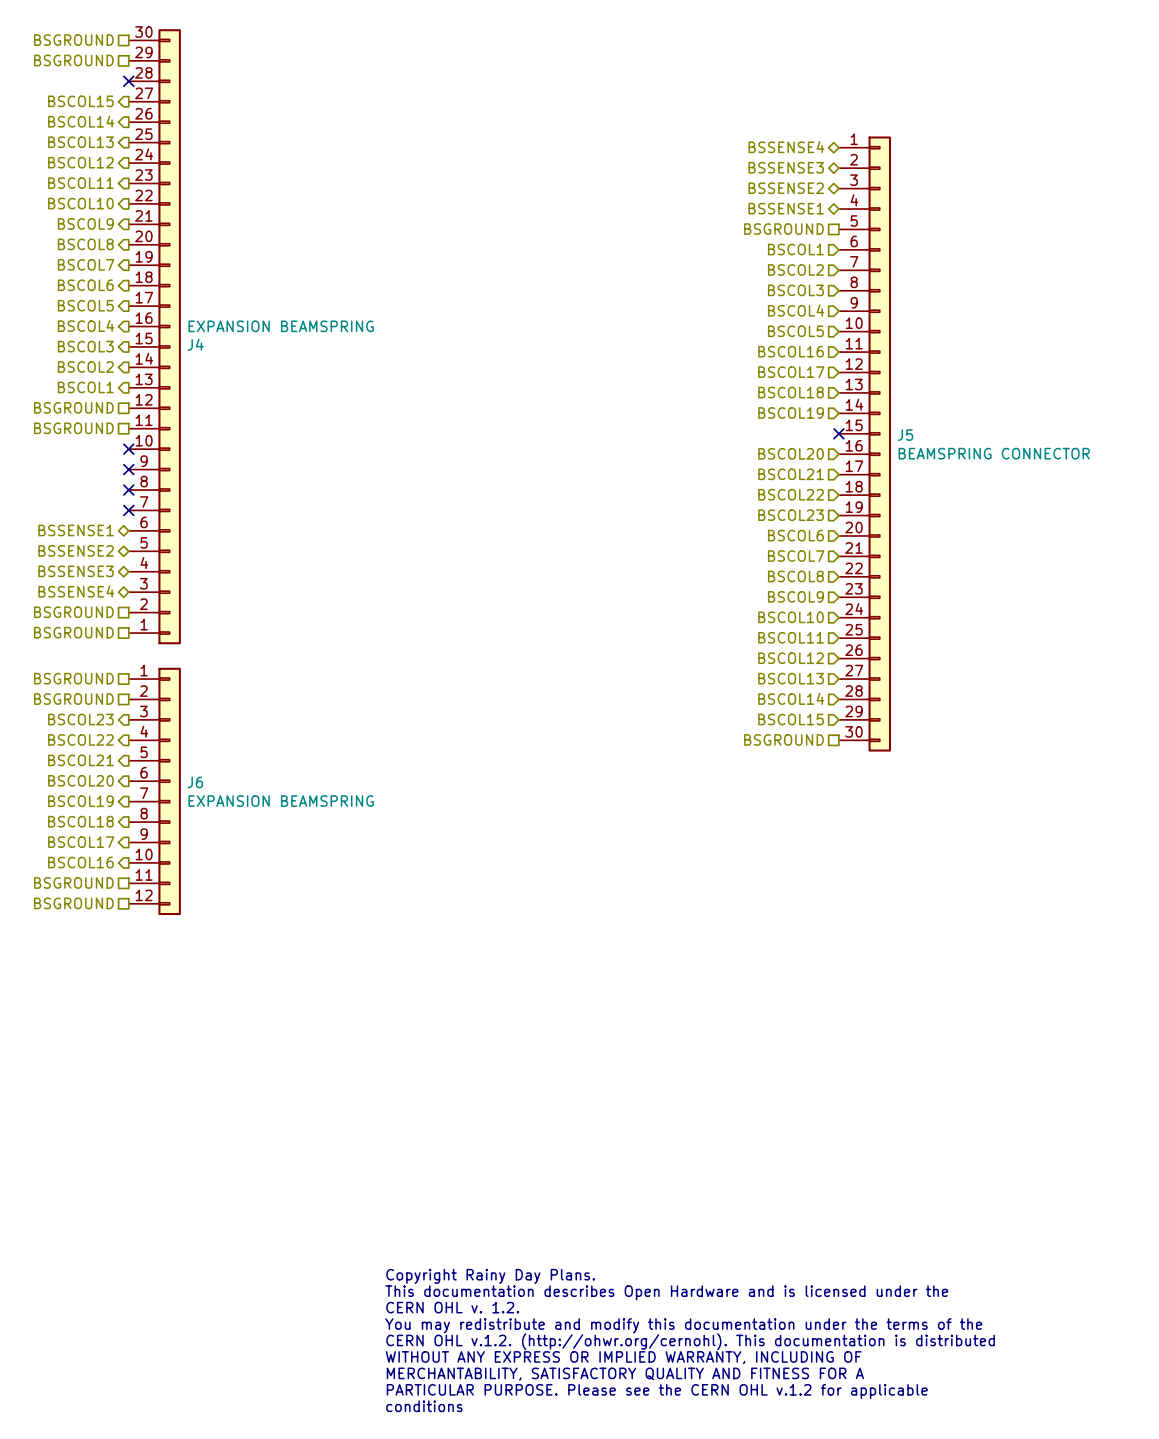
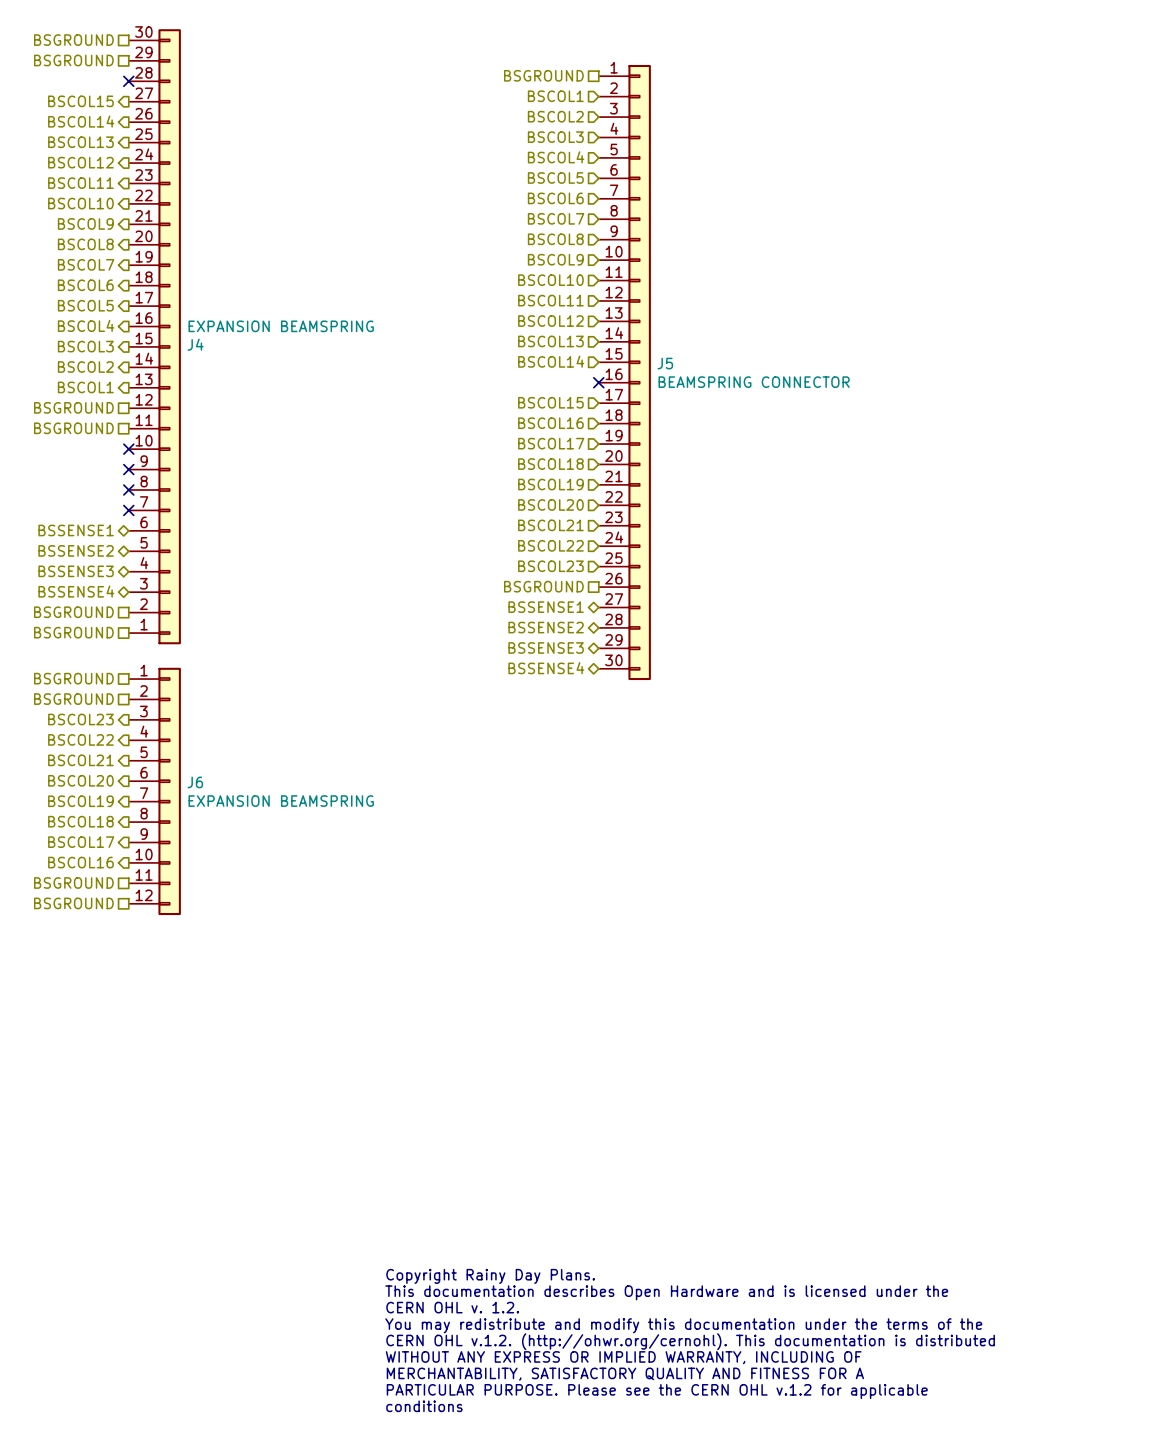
hierarchical label: none -> BSGROUND (543, 75)
hierarchical label: none -> BSCOL1 (555, 96)
hierarchical label: none -> BSCOL2 (555, 116)
hierarchical label: none -> BSCOL3 (555, 137)
hierarchical label: BSSENSE4 (786, 147) -> none
hierarchical label: none -> BSCOL4 (556, 157)
hierarchical label: BSSENSE3 (786, 167) -> none
hierarchical label: none -> BSCOL5 (555, 177)
hierarchical label: BSSENSE2 (786, 188) -> none
hierarchical label: none -> BSCOL6 (555, 198)
hierarchical label: BSSENSE1 (786, 208) -> none
hierarchical label: none -> BSCOL7 (556, 218)
hierarchical label: BSGROUND (784, 229) -> none
hierarchical label: none -> BSCOL8 (555, 239)
hierarchical label: BSCOL1 (795, 249) -> none
hierarchical label: none -> BSCOL9 (555, 259)
hierarchical label: BSCOL2 (795, 269) -> none
hierarchical label: none -> BSCOL10 (550, 280)
hierarchical label: BSCOL3 (795, 290) -> none
hierarchical label: none -> BSCOL11 (550, 300)
hierarchical label: BSCOL4 (796, 310) -> none
hierarchical label: none -> BSCOL12 (550, 321)
hierarchical label: BSCOL5 (795, 331) -> none
hierarchical label: none -> BSCOL13 (550, 341)
hierarchical label: BSCOL16 (791, 351) -> none
hierarchical label: none -> BSCOL14 (551, 361)
hierarchical label: BSCOL17 (791, 372) -> none
no-connect mark: none -> (598, 382)
hierarchical label: BSCOL18 (791, 392) -> none
hierarchical label: none -> BSCOL15 (550, 402)
hierarchical label: BSCOL19 (791, 412) -> none
hierarchical label: none -> BSCOL16 (550, 423)
no-connect mark: (838, 433) -> none
hierarchical label: none -> BSCOL17 (551, 443)
J5 position: (864, 444) -> (624, 372)
hierarchical label: BSCOL20 (791, 453) -> none
hierarchical label: none -> BSCOL18 (550, 464)
hierarchical label: BSCOL21 (791, 474) -> none
hierarchical label: none -> BSCOL19 (550, 484)
hierarchical label: BSCOL22 (791, 494) -> none
hierarchical label: none -> BSCOL20 (550, 504)
hierarchical label: BSCOL23 (791, 515) -> none
hierarchical label: none -> BSCOL21 (550, 525)
hierarchical label: BSCOL6 (795, 535) -> none
hierarchical label: none -> BSCOL22 (550, 545)
hierarchical label: BSCOL7 (796, 556) -> none
hierarchical label: none -> BSCOL23 (550, 566)
hierarchical label: BSCOL8 (795, 576) -> none
hierarchical label: none -> BSGROUND (543, 586)
hierarchical label: BSCOL9 (795, 596) -> none
hierarchical label: none -> BSSENSE1 (546, 607)
hierarchical label: BSCOL10 (791, 617) -> none
hierarchical label: none -> BSSENSE2 (546, 627)
hierarchical label: BSCOL11 (791, 637) -> none
hierarchical label: none -> BSSENSE3 (546, 647)
hierarchical label: BSCOL12 (791, 658) -> none
hierarchical label: none -> BSSENSE4 (546, 668)
hierarchical label: BSCOL13 (791, 678) -> none
hierarchical label: BSCOL14 (791, 698) -> none
hierarchical label: BSCOL15 (791, 719) -> none
hierarchical label: BSGROUND (784, 739) -> none

